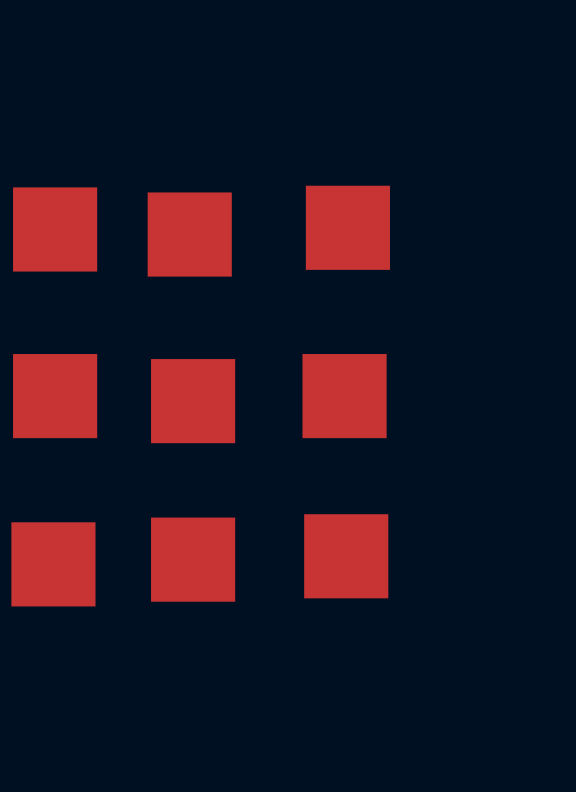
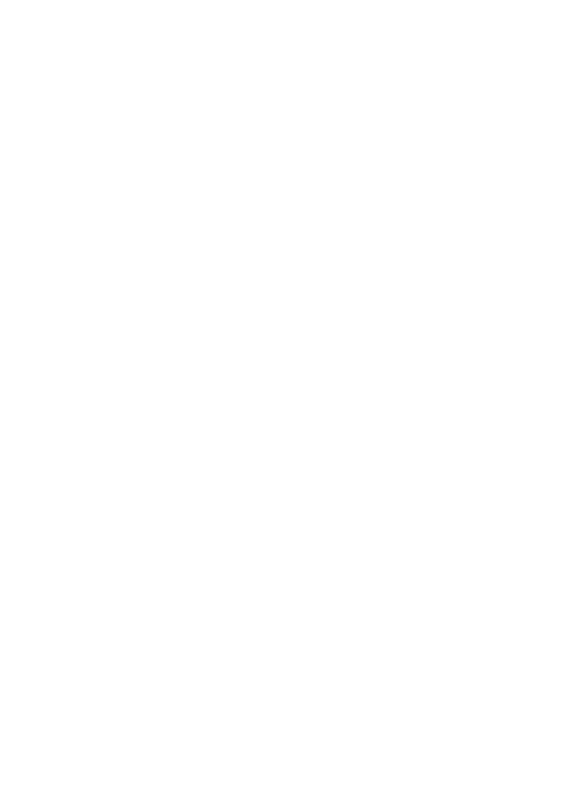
part: (347, 227) -> none
part: (55, 229) -> none
part: (189, 234) -> none
part: (55, 396) -> none
part: (344, 396) -> none
part: (193, 401) -> none
part: (346, 556) -> none
part: (193, 559) -> none
part: (53, 564) -> none

